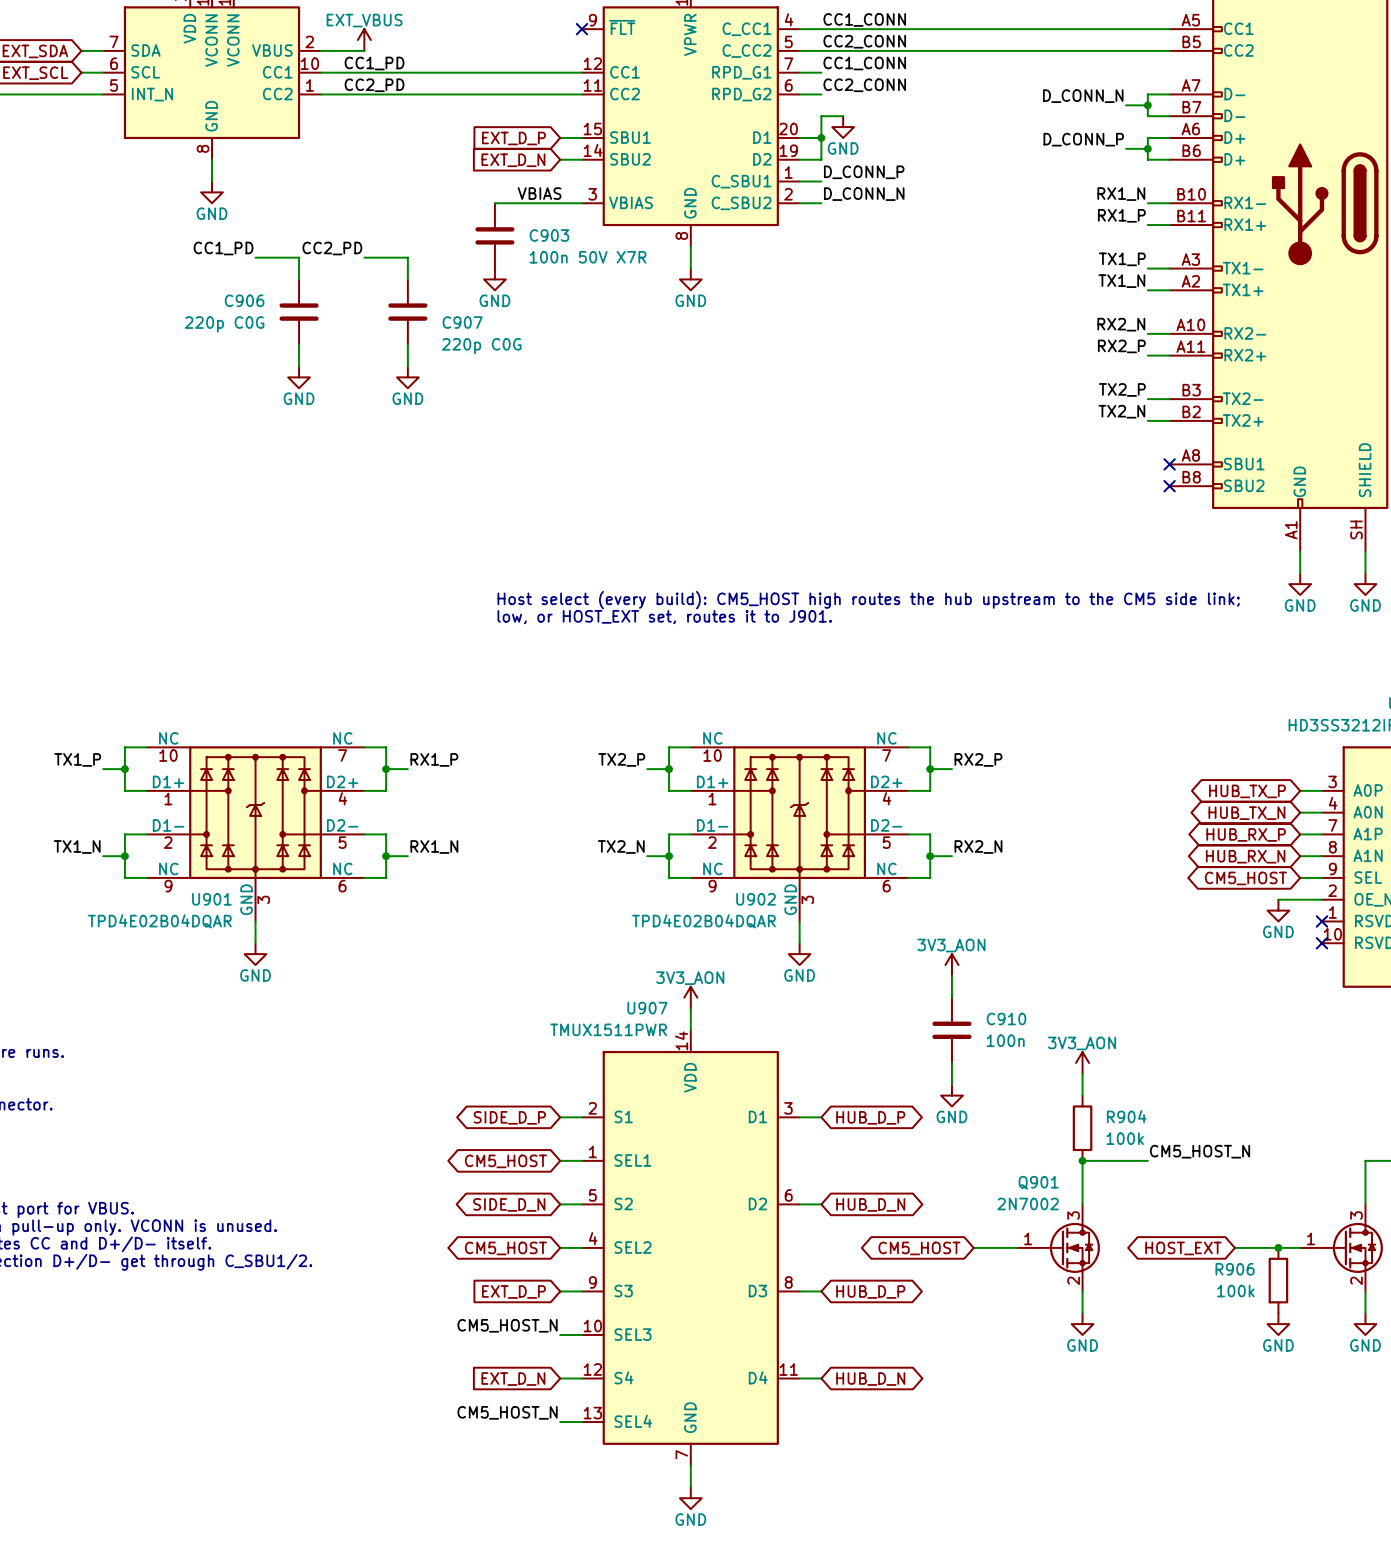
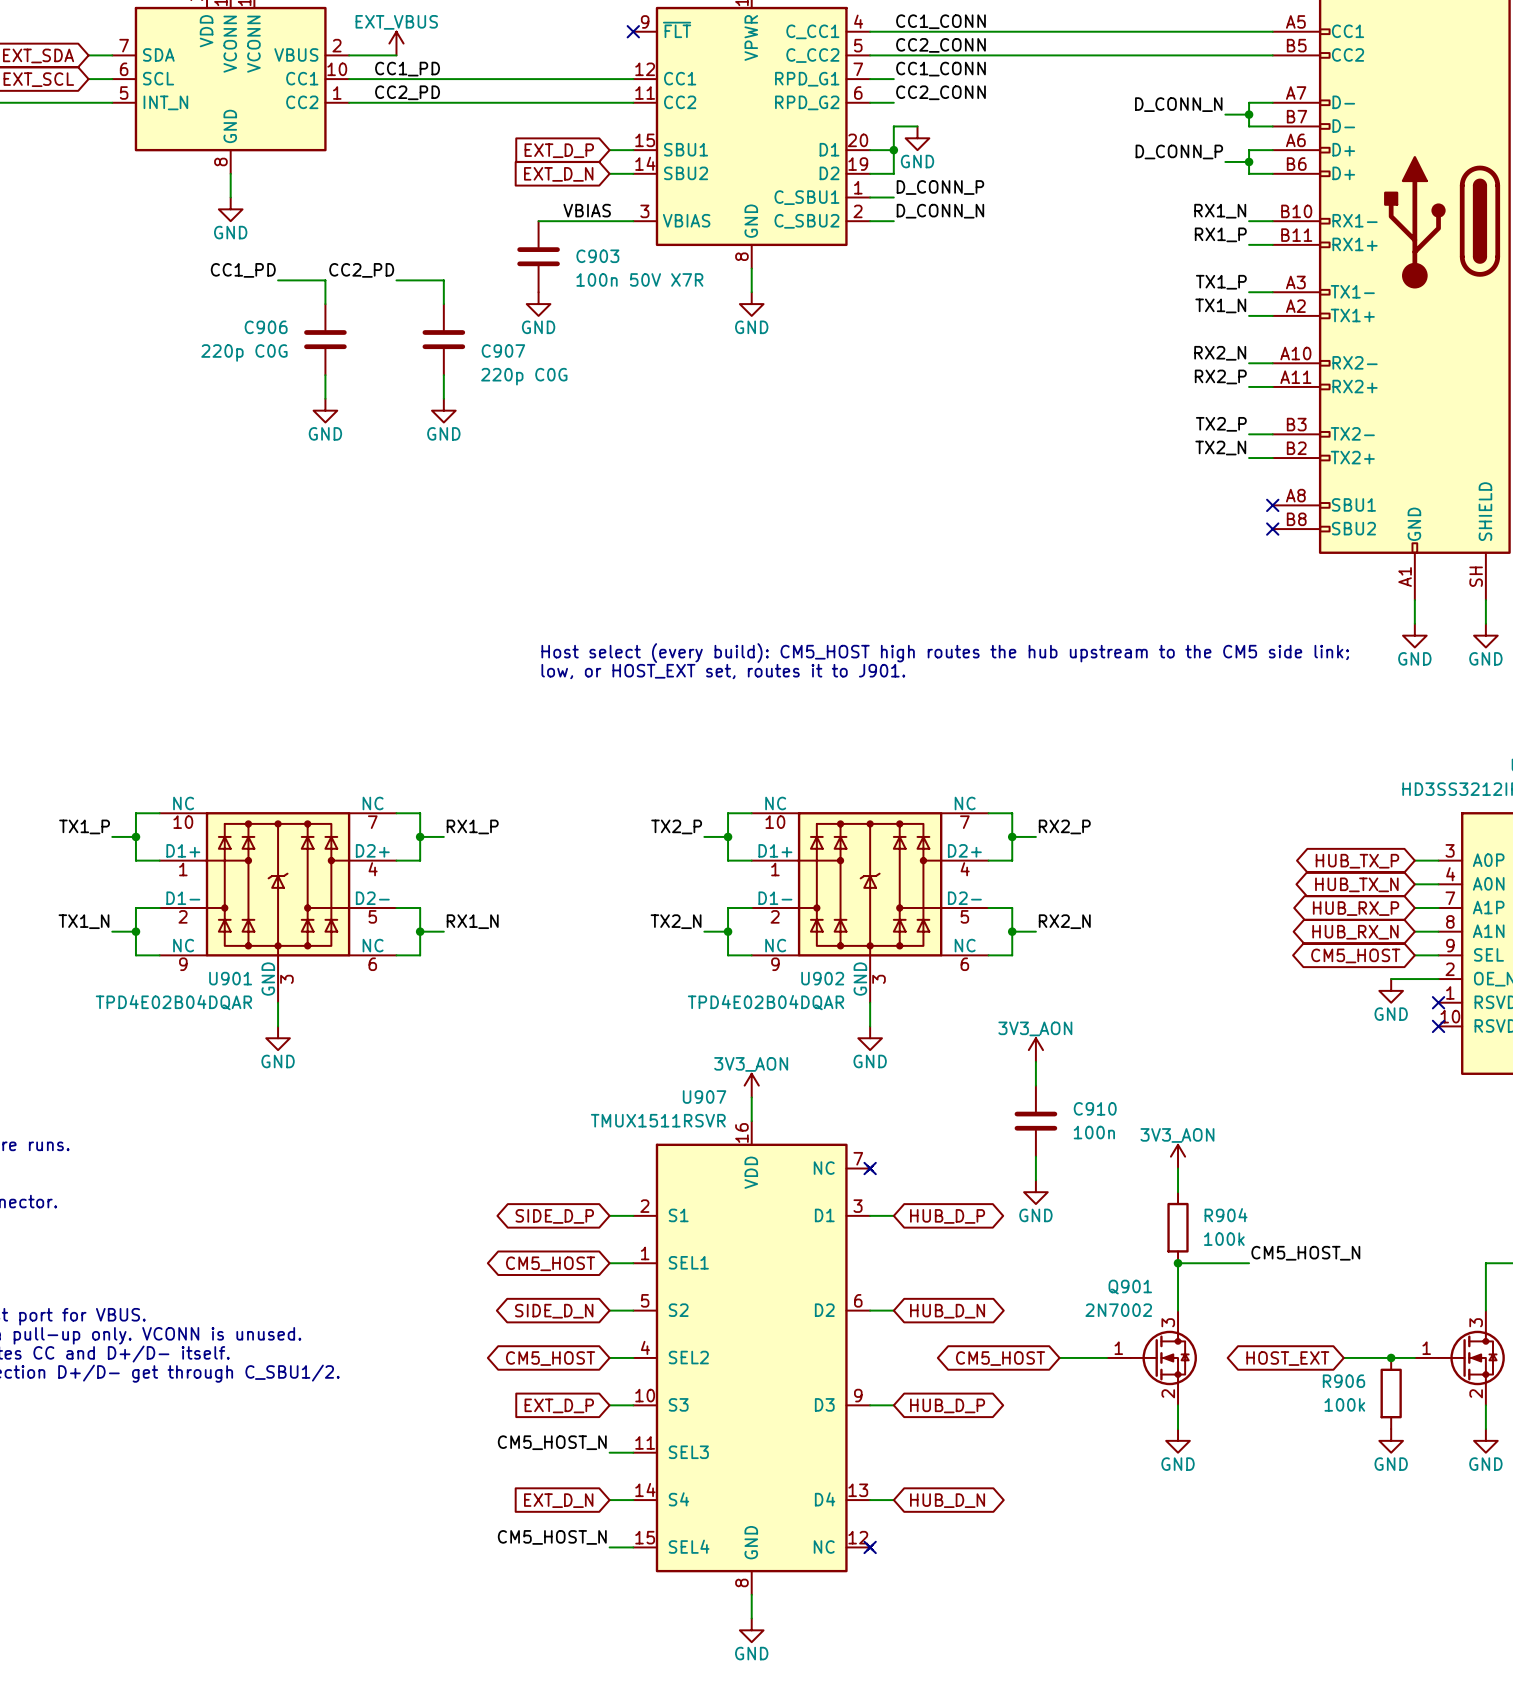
U907 value: TMUX1511PWR (608, 1029) -> TMUX1511RSVR (658, 1120)
U907 symbol: [581, 1030, 800, 1466] -> [633, 1121, 873, 1595]
no-connect mark: none -> (870, 1168)
no-connect mark: none -> (870, 1547)

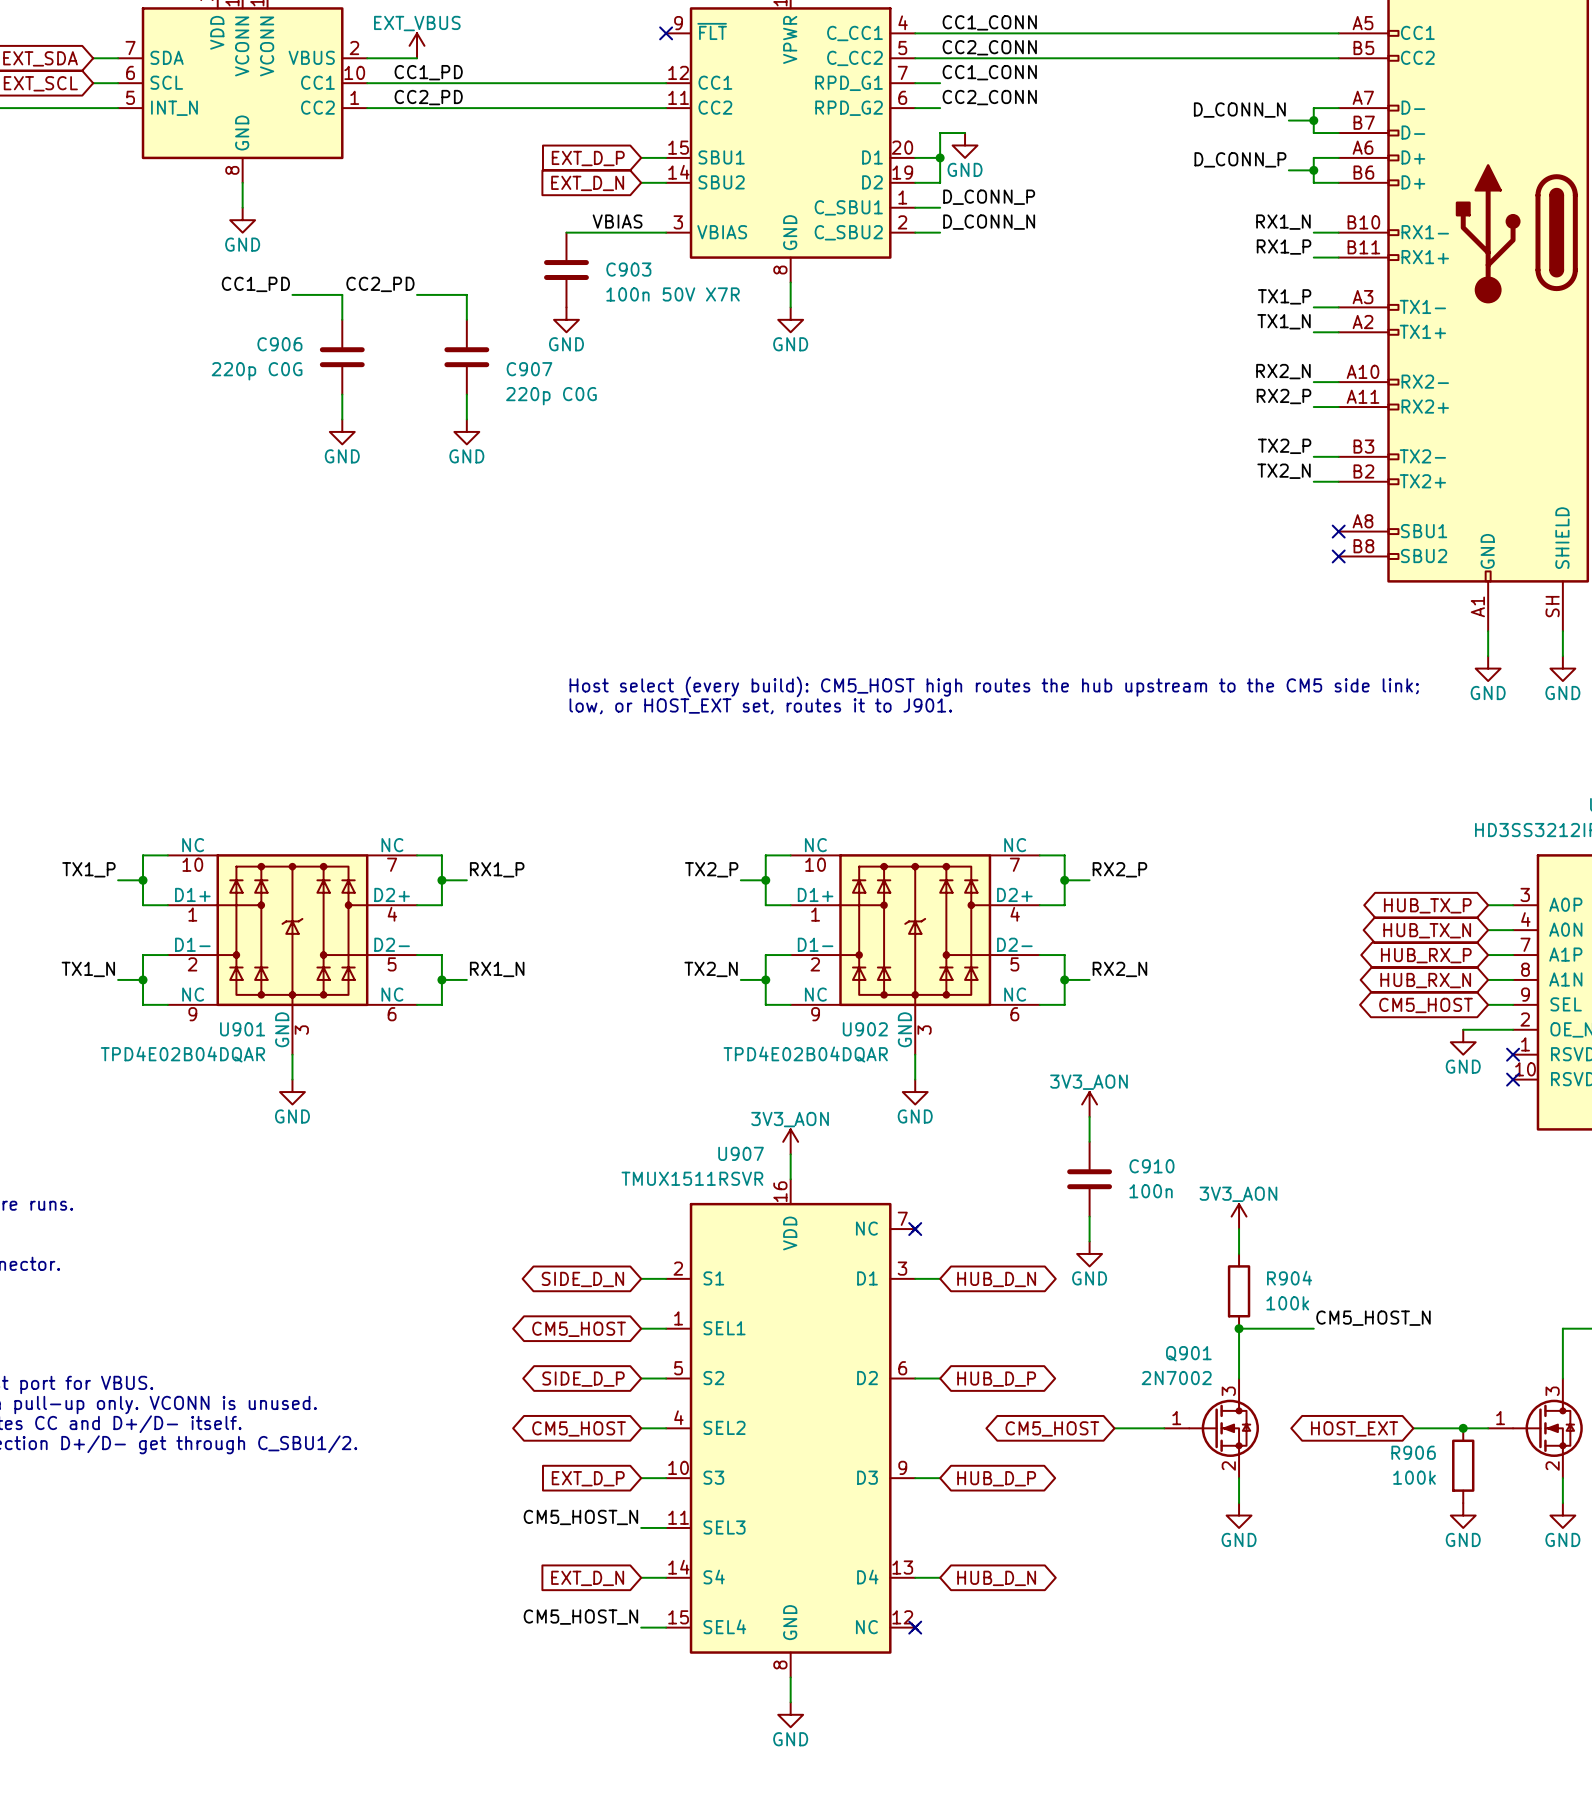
global label: SIDE_D_P (554, 1216) -> SIDE_D_N (582, 1279)
global label: HUB_D_P (947, 1216) -> HUB_D_N (996, 1279)
global label: SIDE_D_N (554, 1311) -> SIDE_D_P (583, 1379)
global label: HUB_D_N (947, 1311) -> HUB_D_P (996, 1379)

